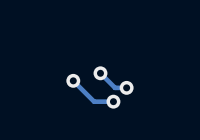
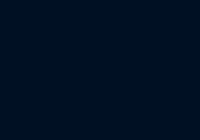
track: (100, 73) (115, 87) (126, 87) -> none
via: (100, 73) -> none
track: (73, 80) (94, 101) (113, 101) -> none
via: (73, 80) -> none
via: (126, 87) -> none
via: (113, 101) -> none

